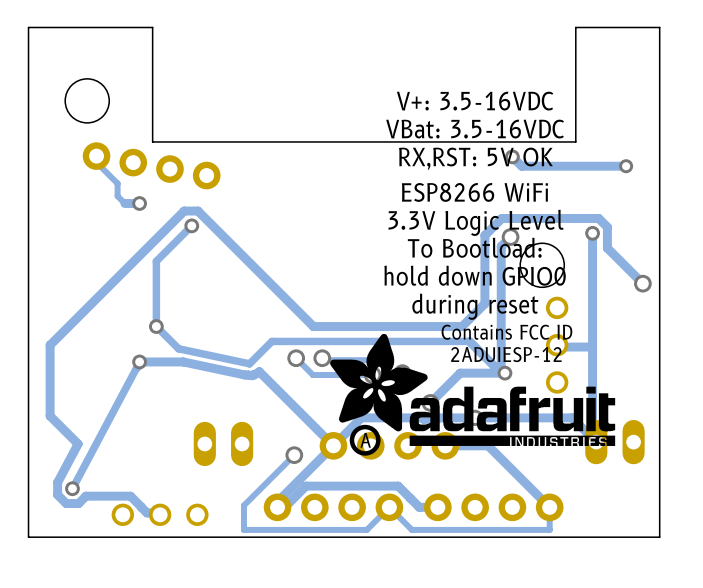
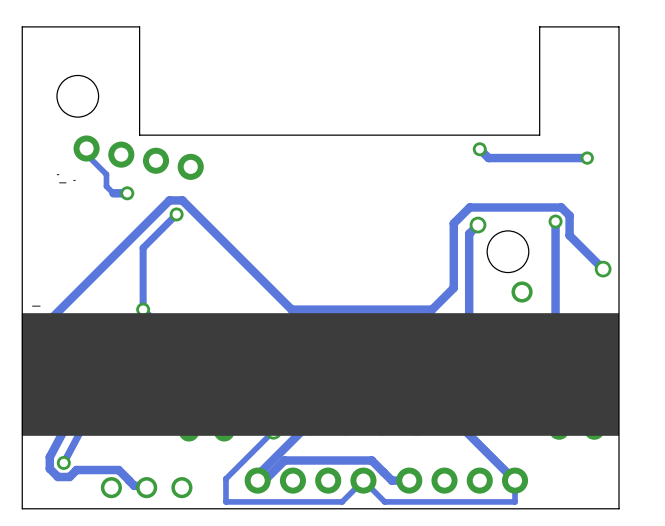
text: V+: 3.5-16VDC (475, 101) -> none
text: VBat: 3.5-16VDC (475, 129) -> none
text: RX,RST: 5V OK (475, 158) -> none
drawing: none -> [21, 174, 620, 436]
text: ESP8266 WiFi (474, 192) -> none
text: 3.3V Logic Level (476, 222) -> none
text: To Bootload: (474, 247) -> none
text: hold down GPIO0 (475, 275) -> none
text: during reset (475, 306) -> none
text: Contains FCC ID (506, 332) -> none
text: 2ADUIESP-12 (506, 354) -> none
drawing: [349, 424, 381, 456] -> none

